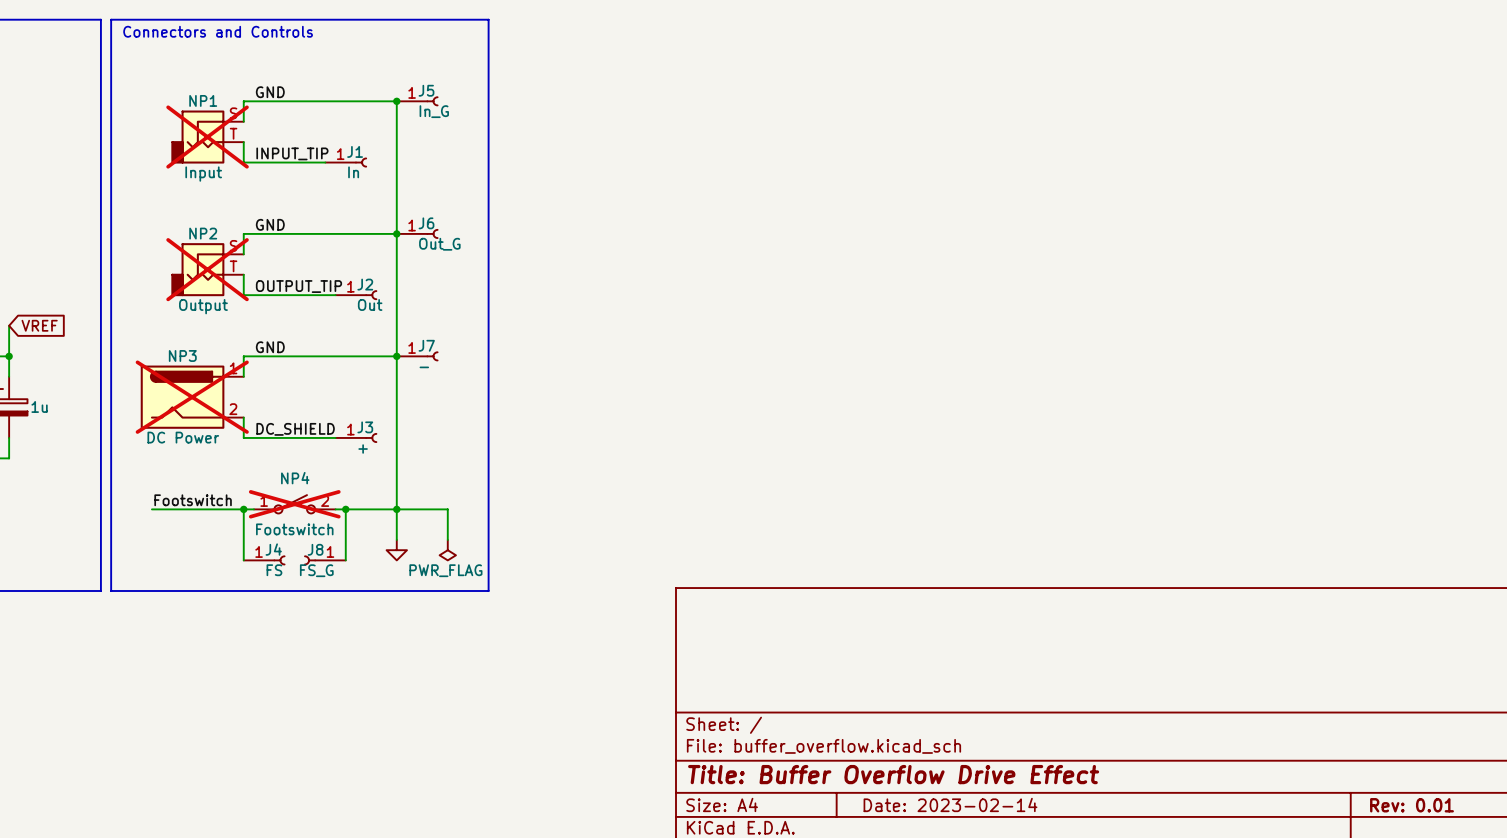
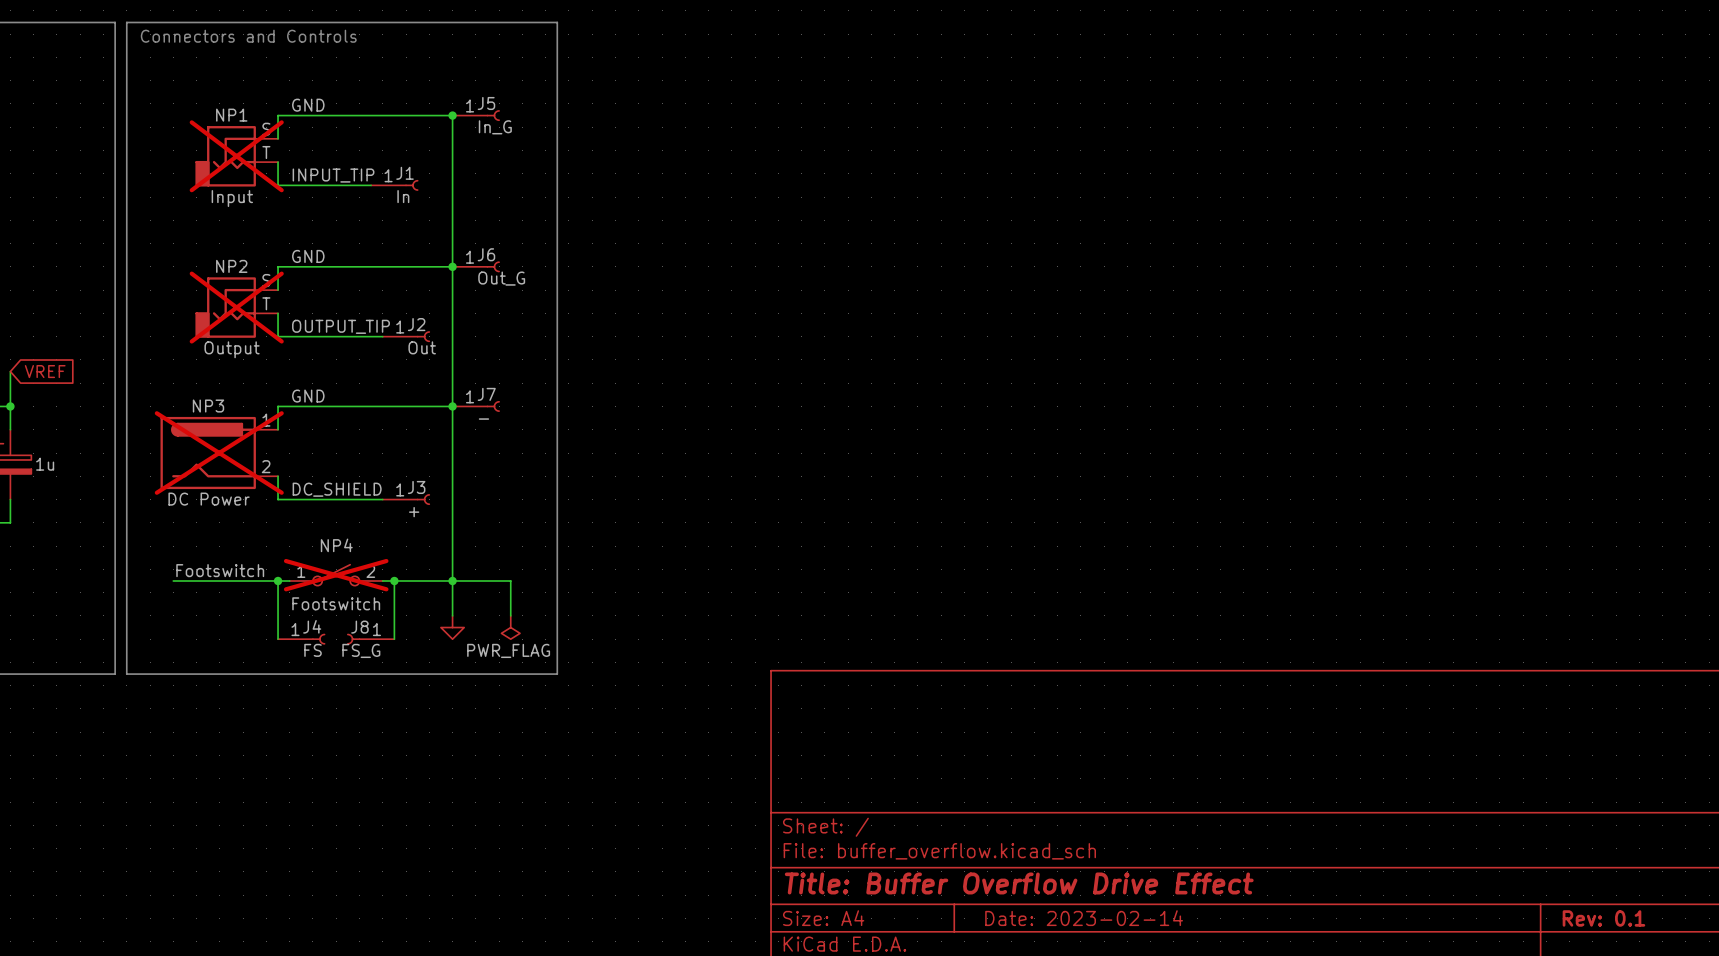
title block: Rev: 0.01 (1412, 805) -> Rev: 0.1 (1603, 918)

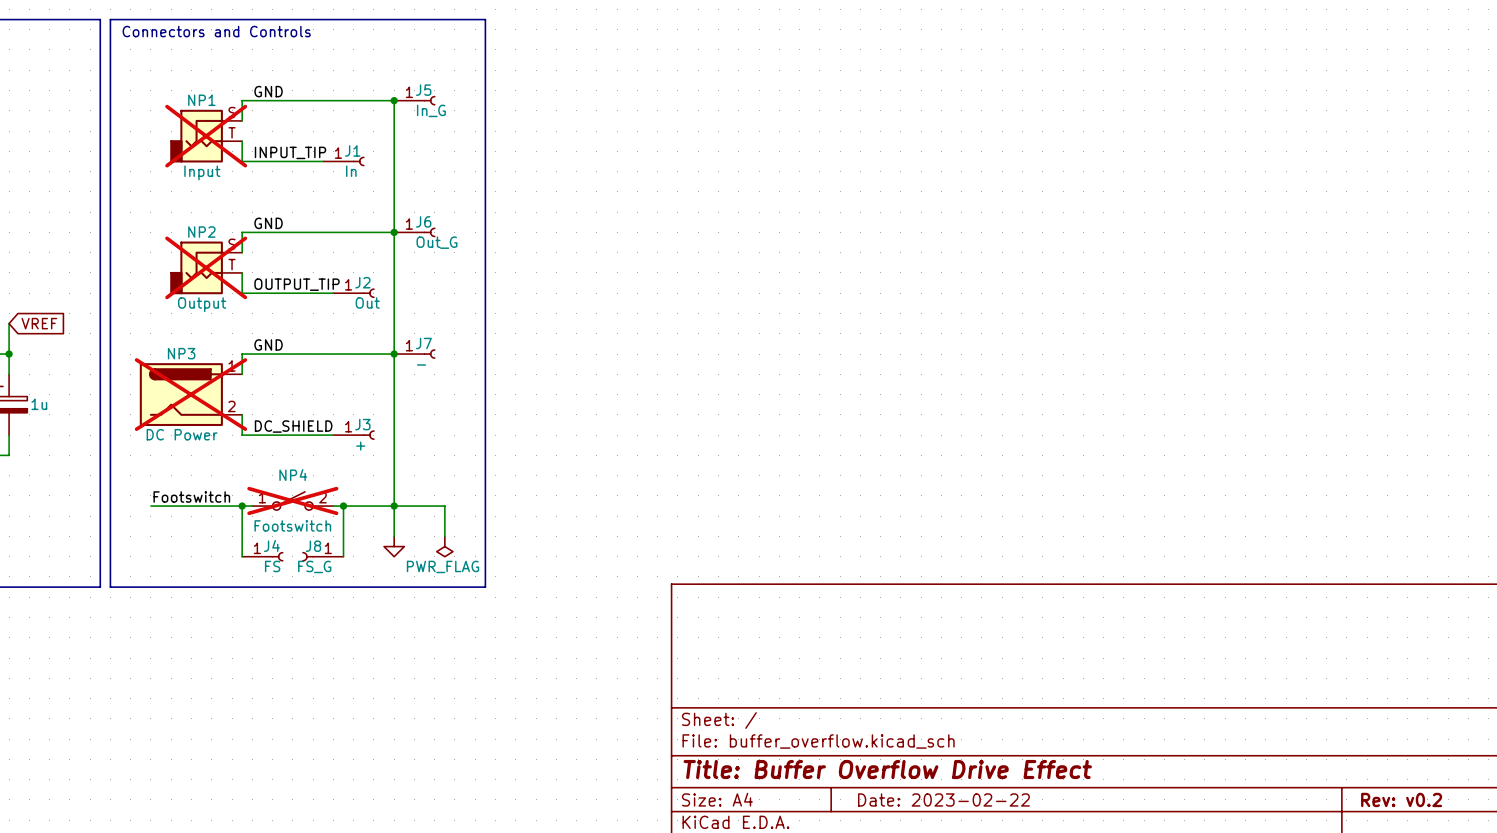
title block: Date: 2023-02-14 (1084, 918) -> Date: 2023-02-22 (943, 799)
title block: Rev: 0.1 (1603, 918) -> Rev: v0.2 (1401, 799)

